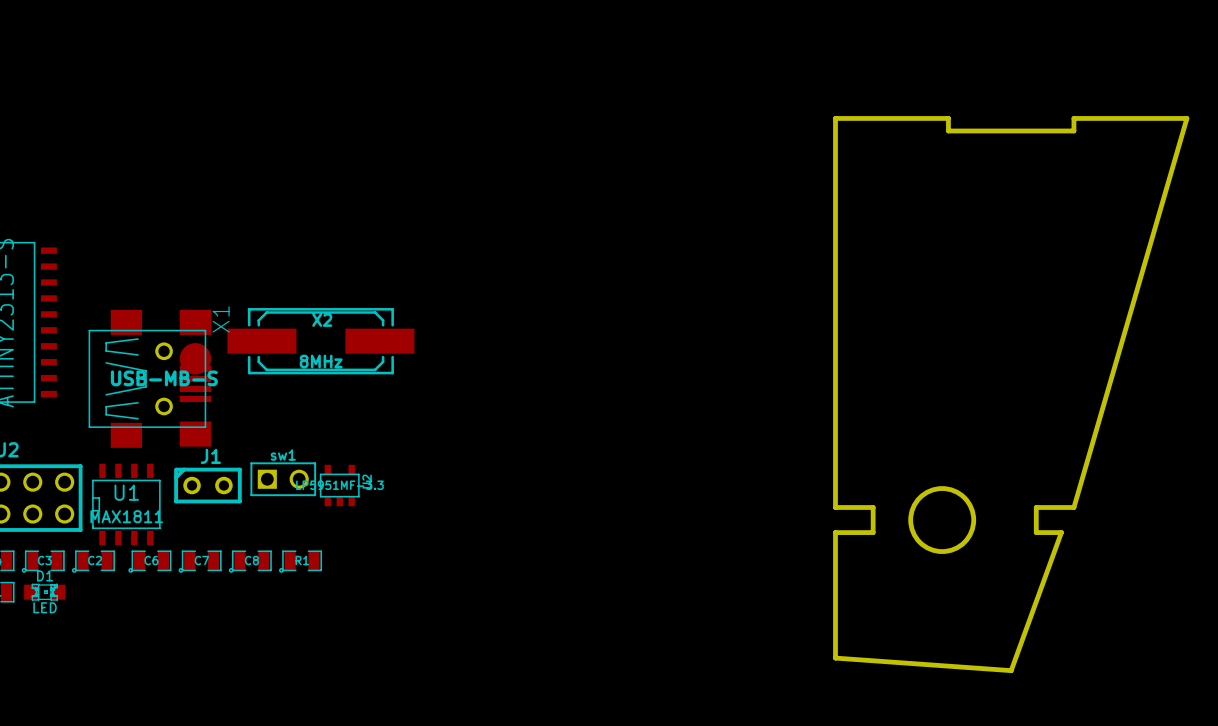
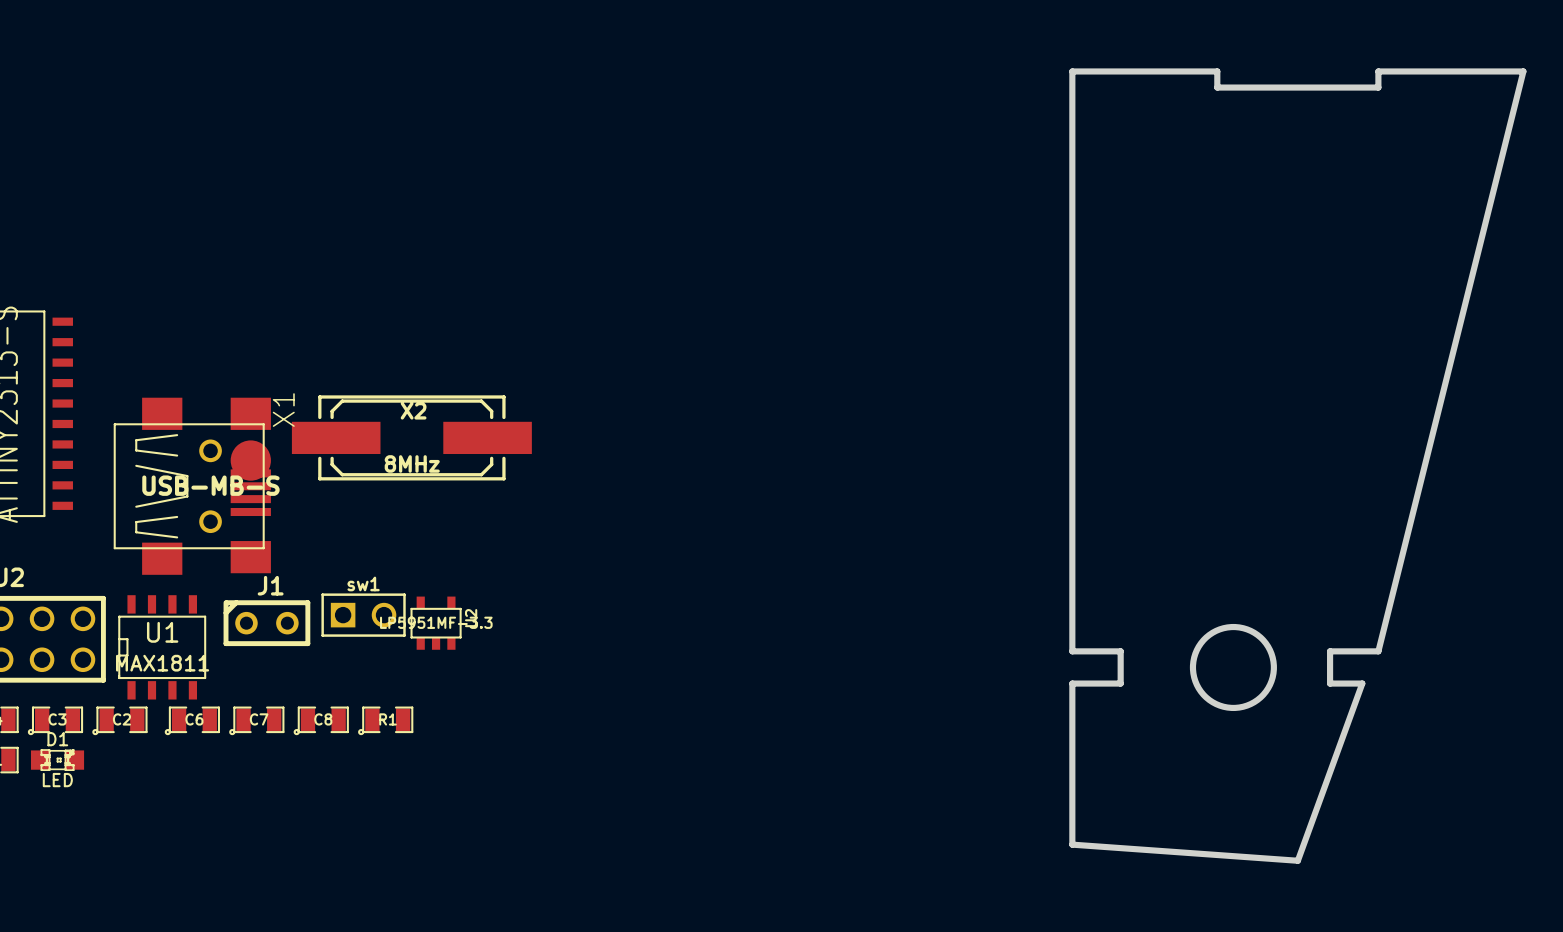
board edge: (835, 118) (948, 118) (948, 130) (1073, 130) (1073, 118) (1186, 118) (1073, 507) -> (1072, 151) (1072, 71) (1217, 71) (1217, 87) (1378, 87) (1378, 71) (1523, 71) (1378, 651)
round board edge position: (942, 520) -> (1233, 667)

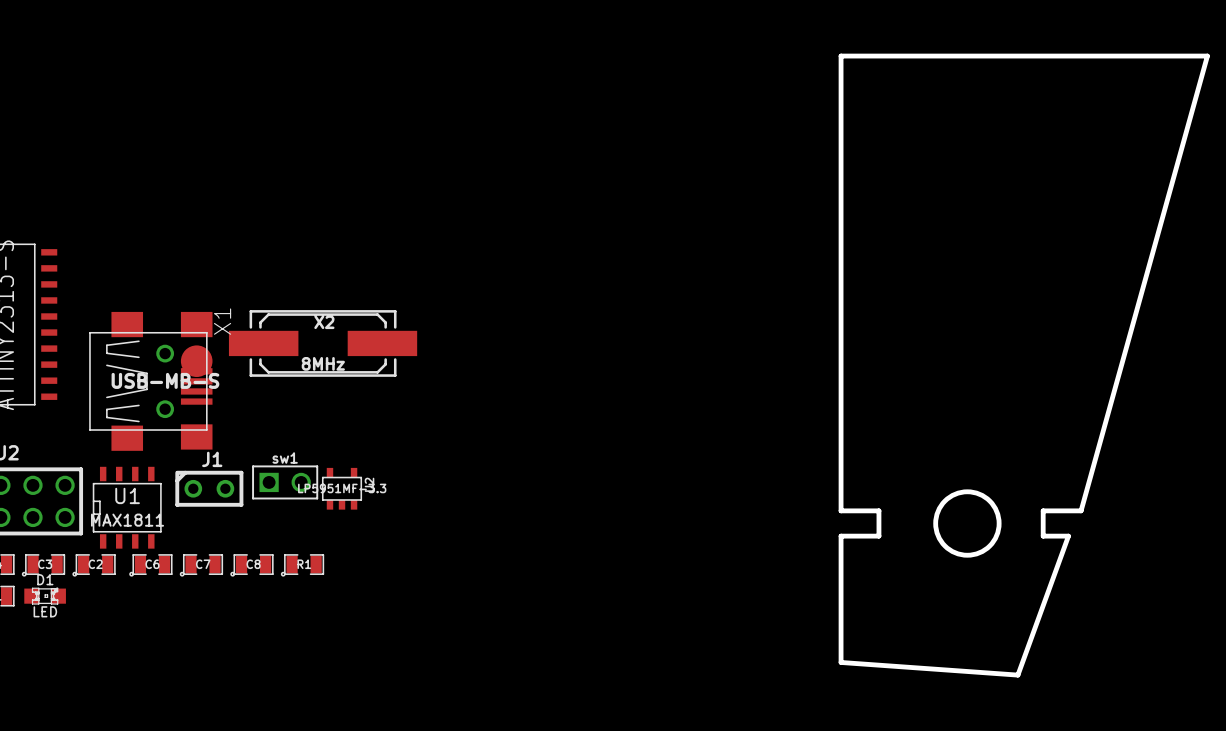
board edge: (1217, 71) (1217, 87) (1378, 87) (1378, 71) -> (954, 56) (1081, 56)
board edge: (1523, 71) (1378, 651) -> (1194, 56) (1207, 56) (1081, 510)

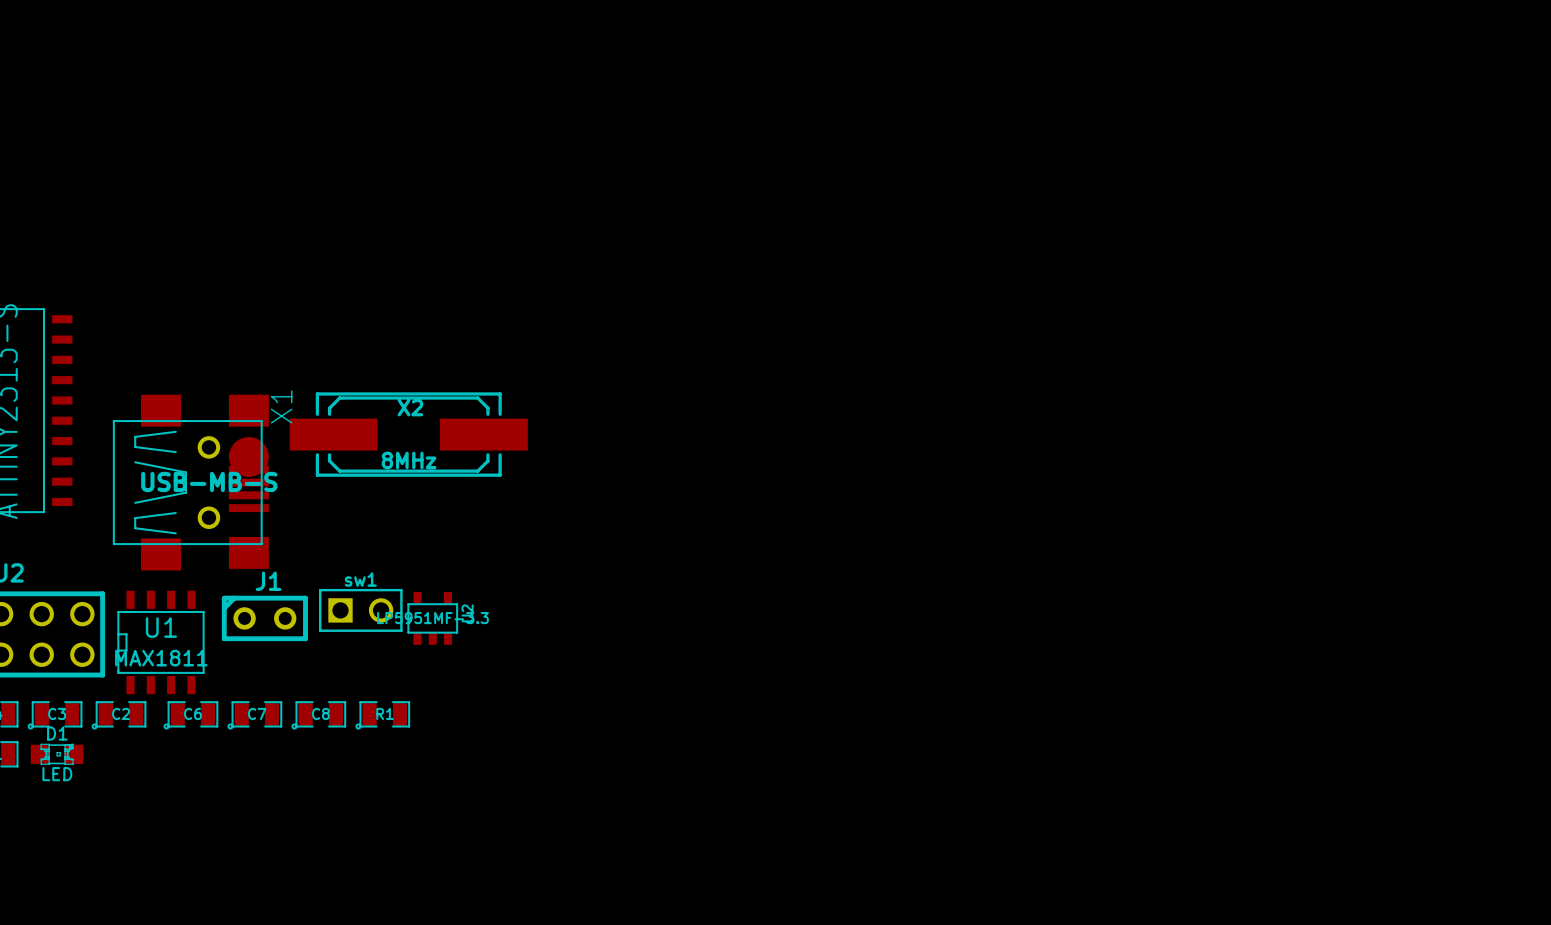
board edge: (841, 56) (1207, 56) (1081, 510) (1043, 510) (1043, 536) (1068, 536) (1017, 675) (841, 662) (841, 536) (878, 536) (878, 510) (841, 510) (841, 56) -> none
round board edge: [933, 489, 1002, 558] -> none

